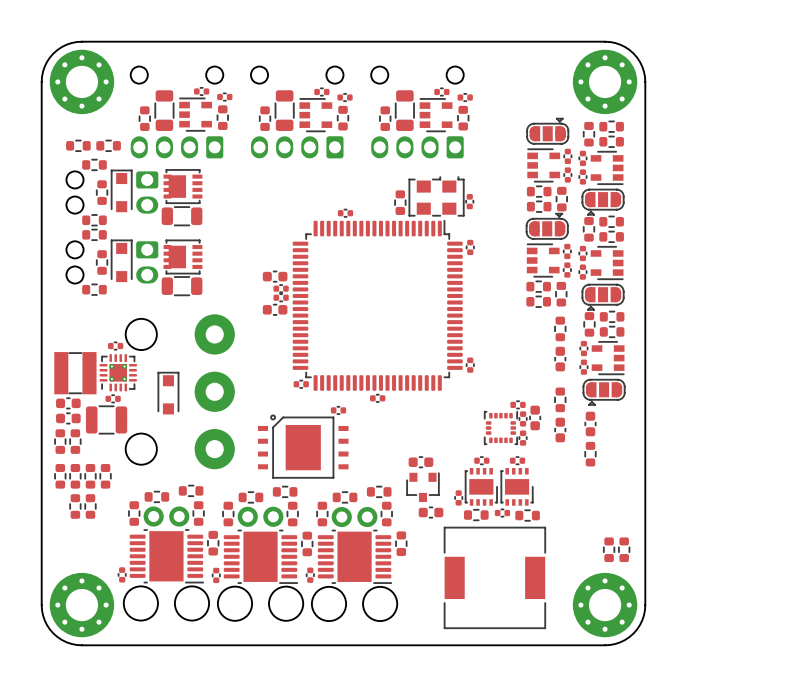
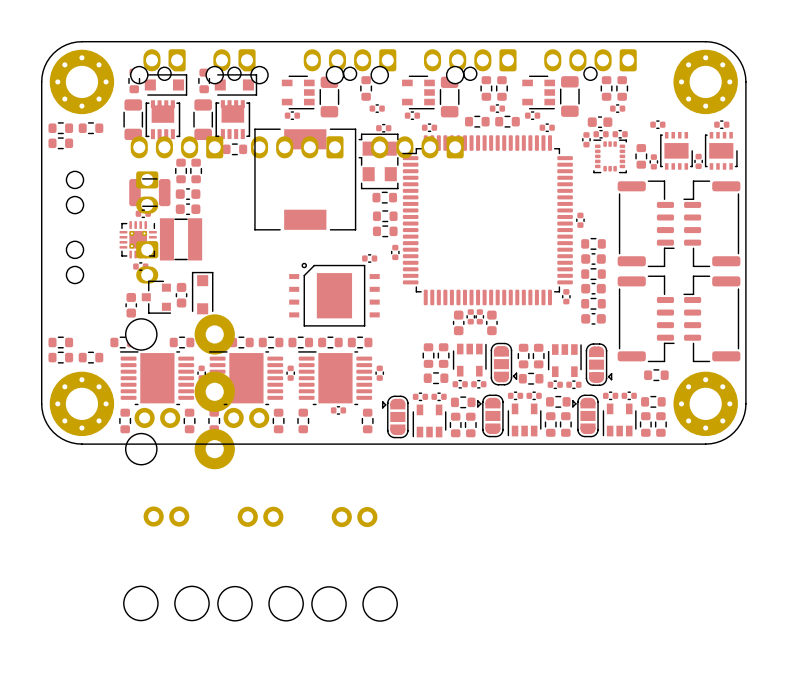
board edge: (605, 41) (620, 44) (633, 53) (642, 66) (645, 81) (645, 605) (639, 625) (625, 639) (605, 645) (81, 645) (66, 642) (50, 629) (42, 610) (41, 403) -> (605, 41) (716, 43) (734, 53) (744, 71) (745, 403) (740, 423) (725, 438) (705, 444) (81, 444) (66, 441) (53, 432) (44, 419) (41, 403)
part footprint: [572, 49, 638, 115] -> [600, 76, 613, 101]
part: none -> (164, 64)
part: none -> (234, 64)
part: none -> (350, 64)
part: none -> (470, 64)
part: none -> (590, 64)
part: none -> (134, 80)
part: none -> (204, 80)
part: none -> (705, 81)
part: none -> (165, 84)
part: none -> (235, 84)
part: none -> (366, 88)
part: none -> (486, 88)
part: none -> (501, 88)
part: none -> (622, 88)
part footprint: [274, 90, 295, 131] -> [284, 111, 301, 120]
part footprint: [395, 90, 415, 131] -> [404, 111, 421, 120]
part: (201, 91) -> none
part: (321, 91) -> none
part: (441, 91) -> none
part: none -> (538, 92)
part: none -> (569, 96)
part footprint: [179, 97, 213, 132] -> [193, 99, 213, 141]
part: (224, 97) -> none
part: none -> (329, 97)
part: (345, 97) -> none
part: none -> (449, 97)
part: (465, 97) -> none
part: none -> (377, 108)
part: none -> (497, 108)
part: none -> (617, 108)
part position: (164, 110) -> (133, 119)
part rotation: 0° (315, 115) -> 180° (298, 92)
part position: (315, 115) -> (298, 92)
part rotation: 0° (436, 115) -> 180° (418, 92)
part position: (436, 115) -> (418, 92)
part: none -> (532, 115)
part: (222, 117) -> none
part: (144, 118) -> none
part: (265, 118) -> none
part: (343, 118) -> none
part: (385, 118) -> none
part rotation: 0° (463, 118) -> 90° clockwise (477, 121)
part footprint: [526, 118, 569, 145] -> [539, 123, 555, 132]
part: none -> (162, 119)
part: none -> (232, 119)
part: none -> (507, 121)
part: none -> (600, 122)
part: none -> (657, 124)
part: none -> (721, 124)
part: (611, 126) -> none
part: none -> (429, 127)
part: none -> (60, 128)
part: none -> (90, 128)
part: none -> (383, 128)
part: (588, 134) -> none
part: none -> (601, 134)
part: none -> (620, 134)
part: none -> (586, 139)
part: (611, 141) -> none
part: none -> (60, 143)
part: (78, 145) -> none
part: (108, 145) -> none
part: none -> (234, 149)
part: none -> (676, 150)
part: none -> (721, 150)
part: (567, 156) -> none
part: none -> (610, 156)
part: none -> (641, 156)
part: (582, 158) -> none
part: none -> (653, 161)
part: none -> (698, 161)
part: (94, 164) -> none
part: (543, 165) -> none
part: (607, 167) -> none
part: none -> (181, 170)
part: none -> (196, 170)
part: (567, 174) -> none
part: (582, 177) -> none
part: none -> (305, 179)
part: (182, 186) -> none
part: (121, 191) -> none
part: (539, 191) -> none
part: (102, 192) -> none
part: none -> (188, 194)
part rotation: 0° (436, 196) -> 90° counterclockwise (378, 161)
part position: (436, 196) -> (378, 161)
part: none -> (384, 197)
part: (561, 199) -> none
part: (469, 201) -> none
part: (400, 202) -> none
part: (603, 202) -> none
part footprint: [161, 206, 203, 227] -> [175, 203, 201, 215]
part: (539, 206) -> none
part: none -> (143, 213)
part: (345, 213) -> none
part: none -> (385, 216)
part: (94, 220) -> none
part: none -> (580, 220)
part: (611, 221) -> none
part: none -> (646, 223)
part: none -> (711, 223)
part: (547, 226) -> none
part: (588, 229) -> none
part: none -> (385, 231)
part: (94, 234) -> none
part: (611, 236) -> none
part: none -> (593, 243)
part: (470, 247) -> none
part: (567, 251) -> none
part: none -> (395, 252)
part: (582, 253) -> none
part: (182, 256) -> none
part: none -> (369, 258)
part: none -> (593, 258)
part: (121, 260) -> none
part: (543, 260) -> none
part: (102, 262) -> none
part: (607, 263) -> none
part: none -> (140, 266)
part: (567, 270) -> none
part: (582, 272) -> none
part: none -> (593, 274)
part footprint: [161, 276, 203, 296] -> [175, 282, 188, 308]
part: (275, 276) -> none
part footprint: [555, 281, 568, 307] -> [562, 289, 571, 305]
part: (538, 286) -> none
part: (281, 288) -> none
part: none -> (593, 288)
part: (94, 289) -> none
part: none -> (202, 293)
part: none -> (156, 297)
part: (281, 297) -> none
part: (603, 297) -> none
part: (538, 301) -> none
part: none -> (593, 303)
part: none -> (131, 305)
part rotation: 0° (377, 305) -> 90° counterclockwise (487, 220)
part position: (377, 305) -> (487, 220)
part: (275, 309) -> none
part footprint: [583, 312, 596, 337] -> [581, 313, 606, 325]
part: none -> (470, 316)
part: none -> (479, 316)
part: (612, 316) -> none
part: none -> (646, 318)
part: none -> (711, 318)
part: none -> (458, 322)
part: none -> (491, 322)
part: (560, 328) -> none
part: (612, 331) -> none
part footprint: [107, 341, 124, 351] -> [110, 336, 136, 349]
part: none -> (60, 342)
part: none -> (182, 342)
part: none -> (241, 342)
part: none -> (271, 342)
part: none -> (300, 342)
part: none -> (330, 342)
part: none -> (360, 342)
part footprint: [554, 346, 567, 372] -> [548, 344, 582, 378]
part: (583, 348) -> none
part: none -> (428, 355)
part: none -> (443, 355)
part: none -> (523, 356)
part: none -> (538, 356)
part: none -> (60, 357)
part: none -> (90, 357)
part footprint: [466, 357, 475, 373] -> [452, 343, 487, 377]
part rotation: 0° (608, 358) -> 90° clockwise (619, 419)
part position: (608, 358) -> (619, 419)
part: none -> (503, 364)
part: none -> (599, 364)
part: (583, 367) -> none
part rotation: 0° (118, 372) -> 180° (138, 239)
part position: (118, 372) -> (138, 239)
part position: (75, 373) -> (181, 239)
part: none -> (201, 373)
part: none -> (379, 373)
part: none -> (656, 375)
part: none -> (157, 378)
part: none -> (246, 378)
part: none -> (335, 378)
part: none -> (436, 378)
part: none -> (531, 378)
part footprint: [582, 379, 626, 406] -> [602, 391, 619, 401]
part rotation: 0° (301, 384) -> 90° clockwise (290, 373)
part position: (301, 384) -> (290, 373)
part: none -> (460, 384)
part: none -> (478, 384)
part: none -> (555, 384)
part: none -> (573, 384)
part: (168, 393) -> none
part: none -> (515, 395)
part: none -> (534, 395)
part: none -> (629, 395)
part: none -> (420, 396)
part: none -> (439, 396)
part: (113, 398) -> none
part: (377, 398) -> none
part rotation: 0° (560, 399) -> 90° clockwise (558, 401)
part: none -> (653, 401)
part: none -> (463, 402)
part: (68, 403) -> none
part: (518, 404) -> none
part footprint: [518, 411, 528, 427] -> [507, 403, 542, 437]
part footprint: [584, 411, 597, 437] -> [572, 394, 599, 438]
part: none -> (490, 415)
part: none -> (395, 416)
part: none -> (157, 417)
part: none -> (246, 417)
part: (535, 417) -> none
part: (68, 418) -> none
part position: (106, 419) -> (149, 192)
part: none -> (125, 420)
part: none -> (189, 420)
part: none -> (214, 420)
part: none -> (278, 420)
part: none -> (303, 420)
part: none -> (367, 420)
part: none -> (429, 420)
part: none -> (455, 424)
part: none -> (470, 424)
part: none -> (550, 424)
part: none -> (565, 424)
part: none -> (645, 424)
part: none -> (660, 424)
part: (500, 428) -> none
part: (560, 430) -> none
part: (523, 438) -> none
part: (60, 441) -> none
part: (75, 441) -> none
part position: (303, 446) -> (334, 294)
part: (590, 454) -> none
part: (481, 460) -> none
part: (517, 460) -> none
part: (420, 462) -> none
part: (60, 476) -> none
part: (75, 476) -> none
part: (90, 476) -> none
part: (105, 476) -> none
part: (481, 486) -> none
part: (517, 486) -> none
part: (422, 487) -> none
part: (191, 490) -> none
part: (285, 491) -> none
part: (379, 491) -> none
part: (156, 496) -> none
part: (250, 497) -> none
part: (345, 497) -> none
part: (458, 497) -> none
part: (75, 506) -> none
part: (90, 506) -> none
part: (431, 512) -> none
part: (134, 513) -> none
part: (198, 513) -> none
part: (502, 513) -> none
part: (228, 514) -> none
part: (292, 514) -> none
part: (322, 514) -> none
part: (386, 514) -> none
part: (476, 515) -> none
part: (527, 515) -> none
part: (213, 543) -> none
part: (307, 543) -> none
part: (401, 543) -> none
part: (609, 549) -> none
part: (624, 549) -> none
part: (166, 556) -> none
part: (260, 556) -> none
part: (354, 556) -> none
part: (122, 574) -> none
part: (216, 575) -> none
part: (310, 575) -> none
part: (494, 577) -> none
part position: (81, 605) -> (81, 403)
part position: (605, 605) -> (705, 403)

